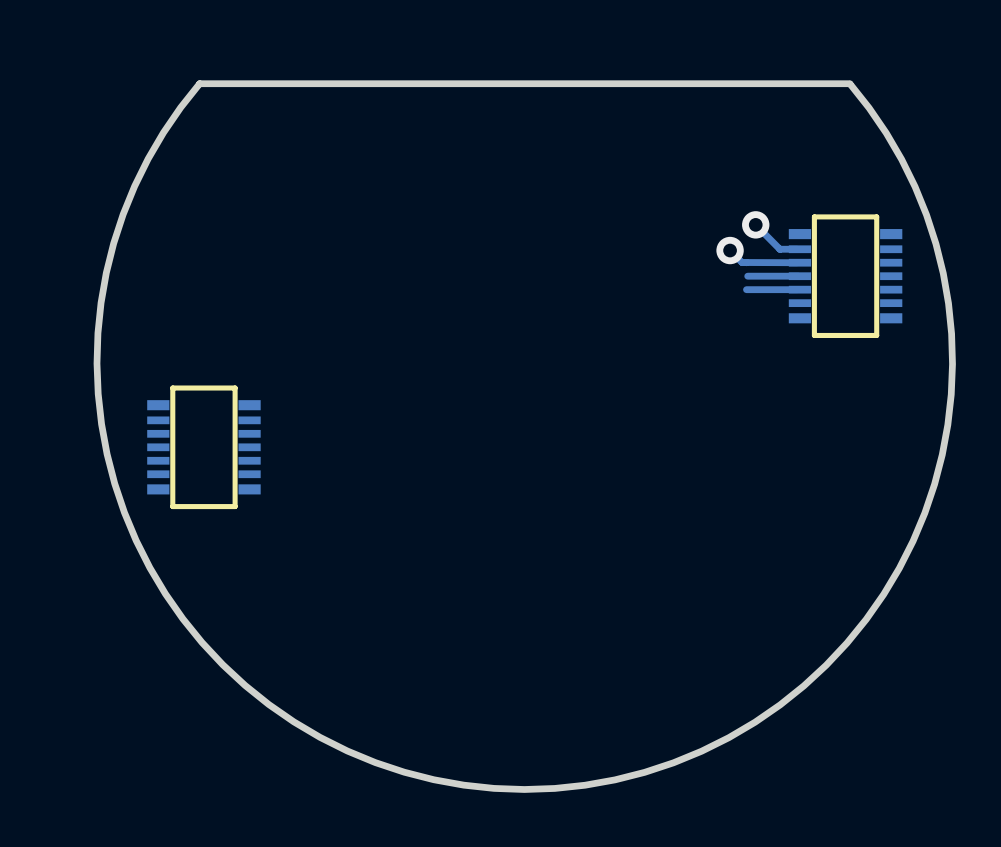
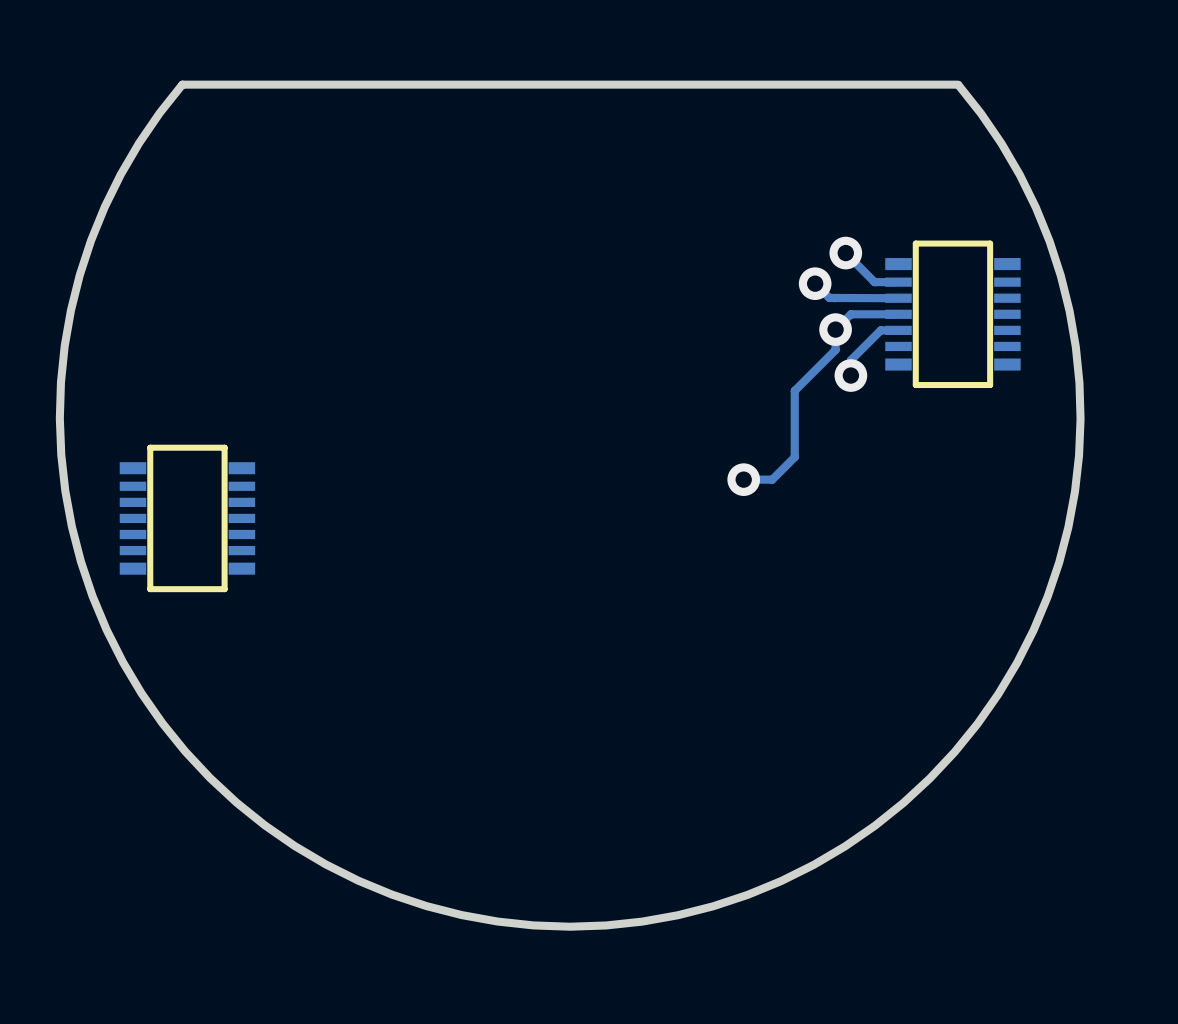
track: (760, 276) (747, 276) -> (850, 314) (835, 329) (835, 350) (794, 390) (794, 457) (772, 479) (743, 479)
via: none -> (835, 329)
track: (785, 289) (746, 289) -> (880, 330) (850, 360) (850, 375)
via: none -> (850, 375)
via: none -> (743, 479)

